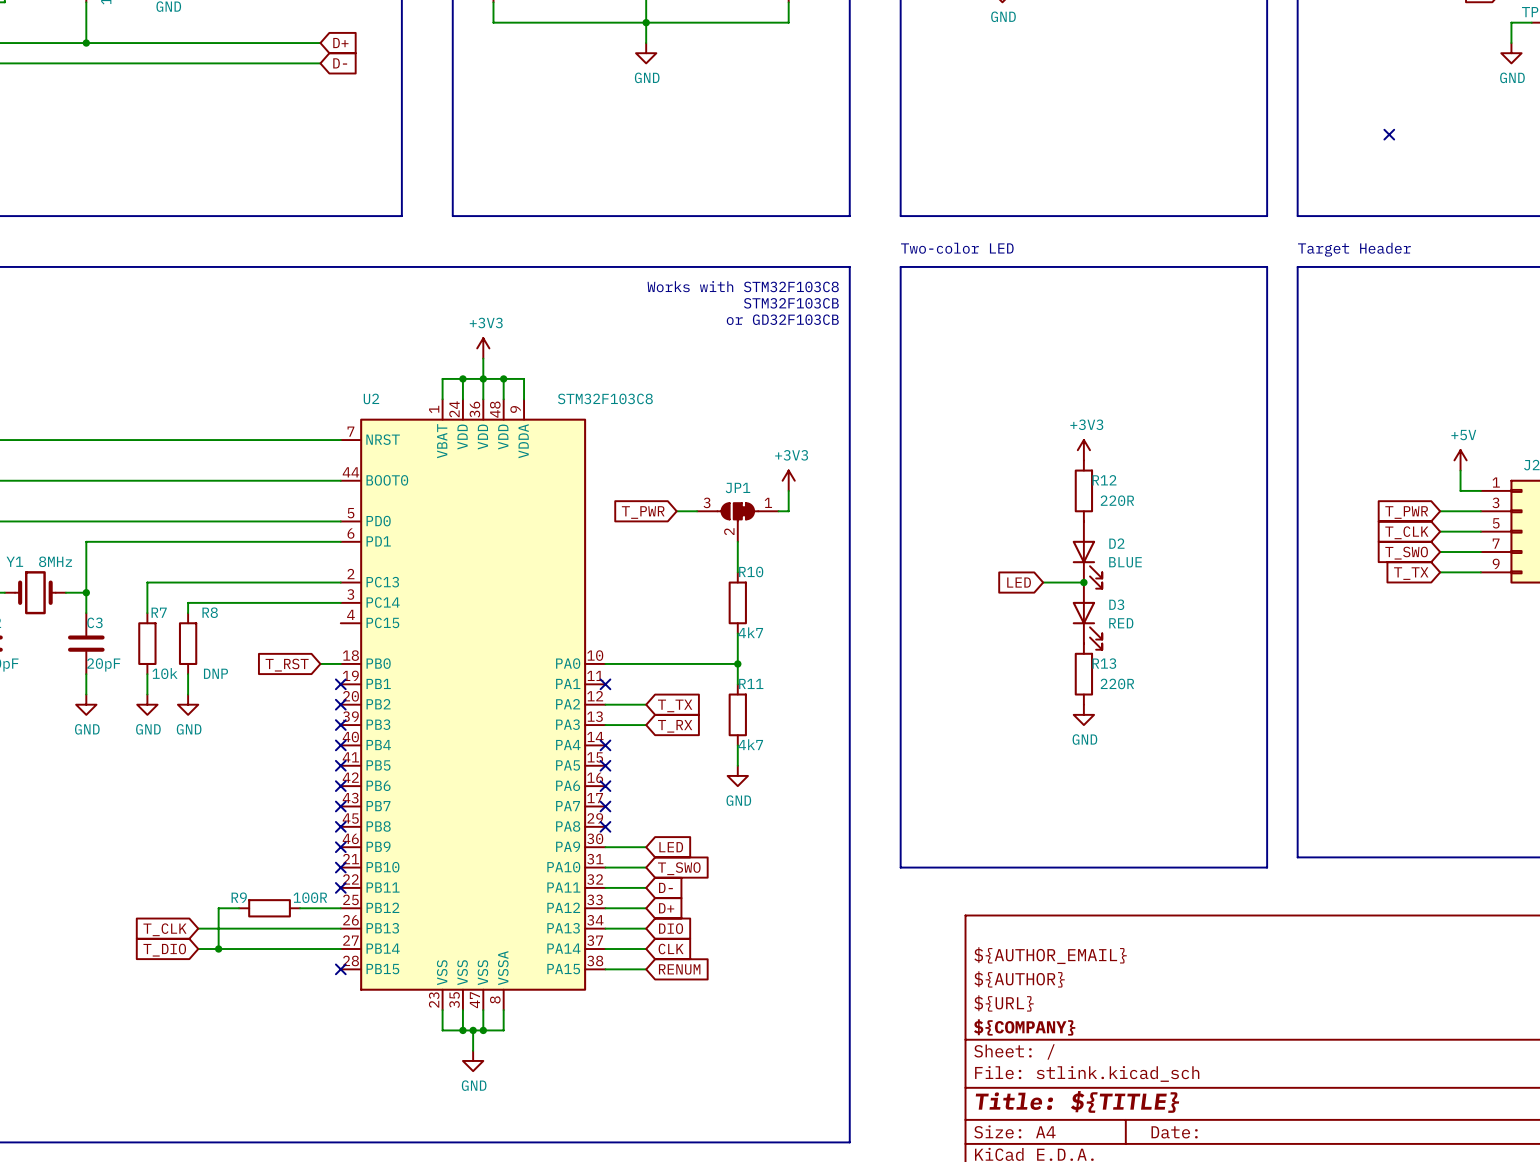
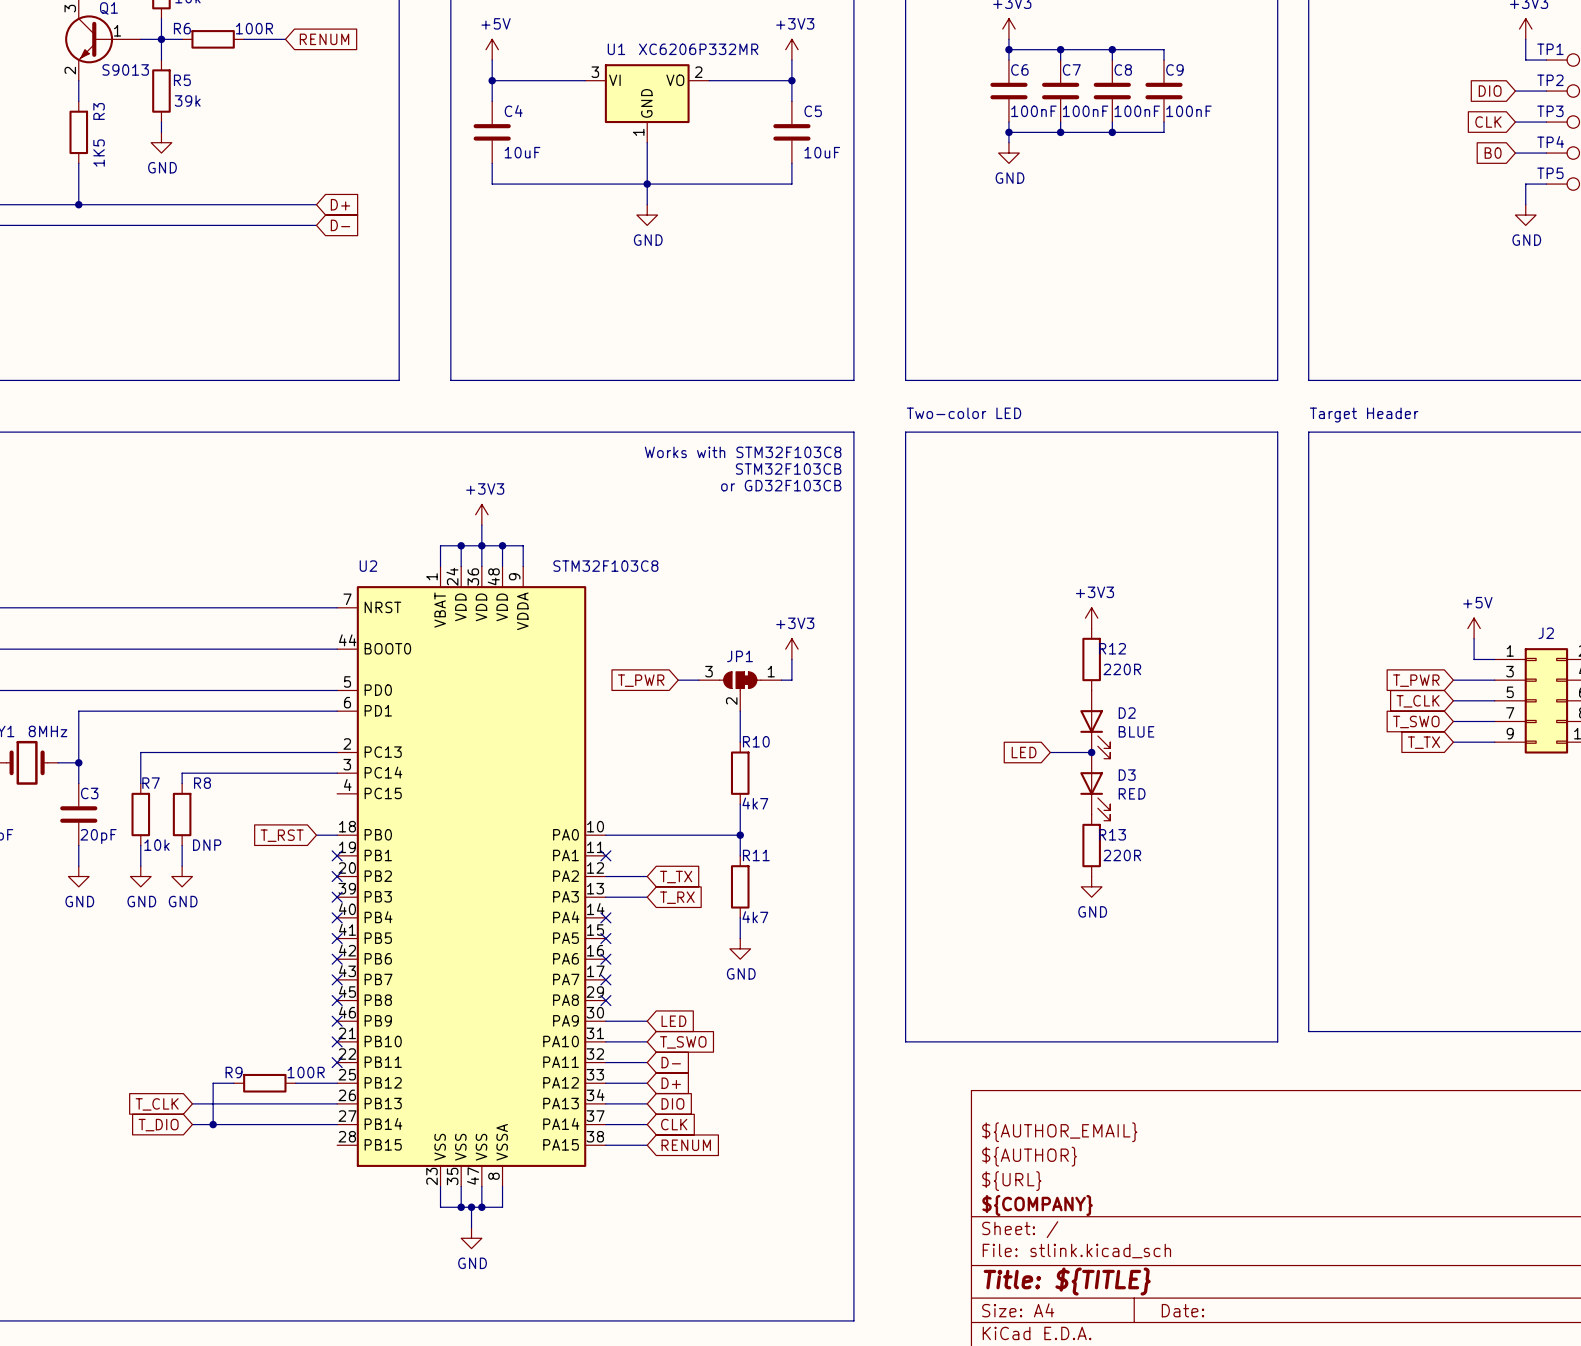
no-connect mark: (1389, 134) -> none
no-connect mark: (340, 969) -> none

